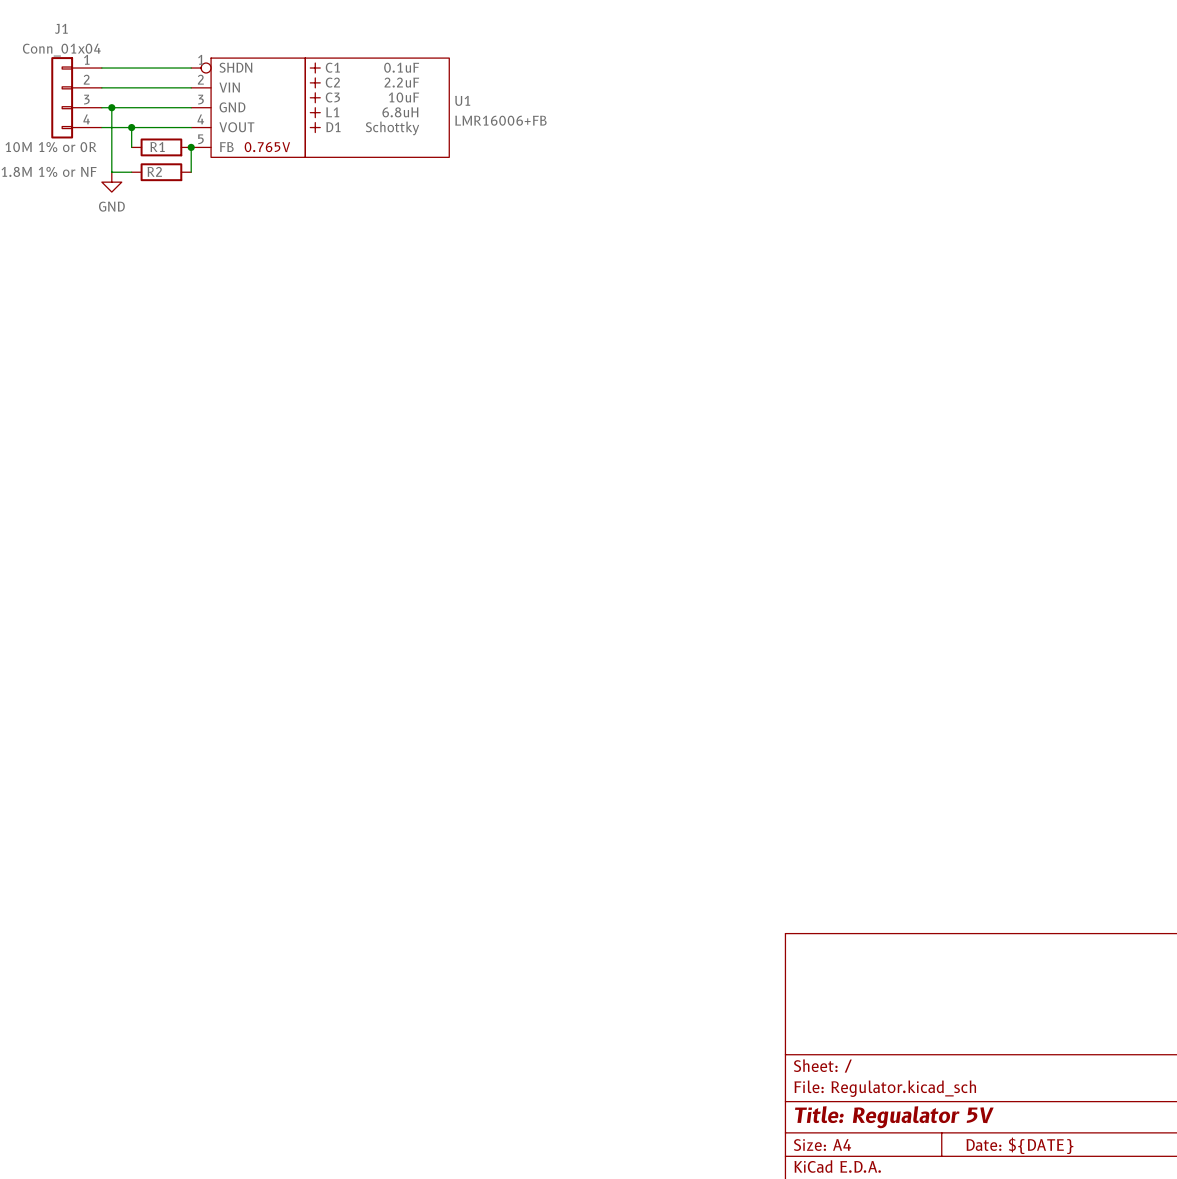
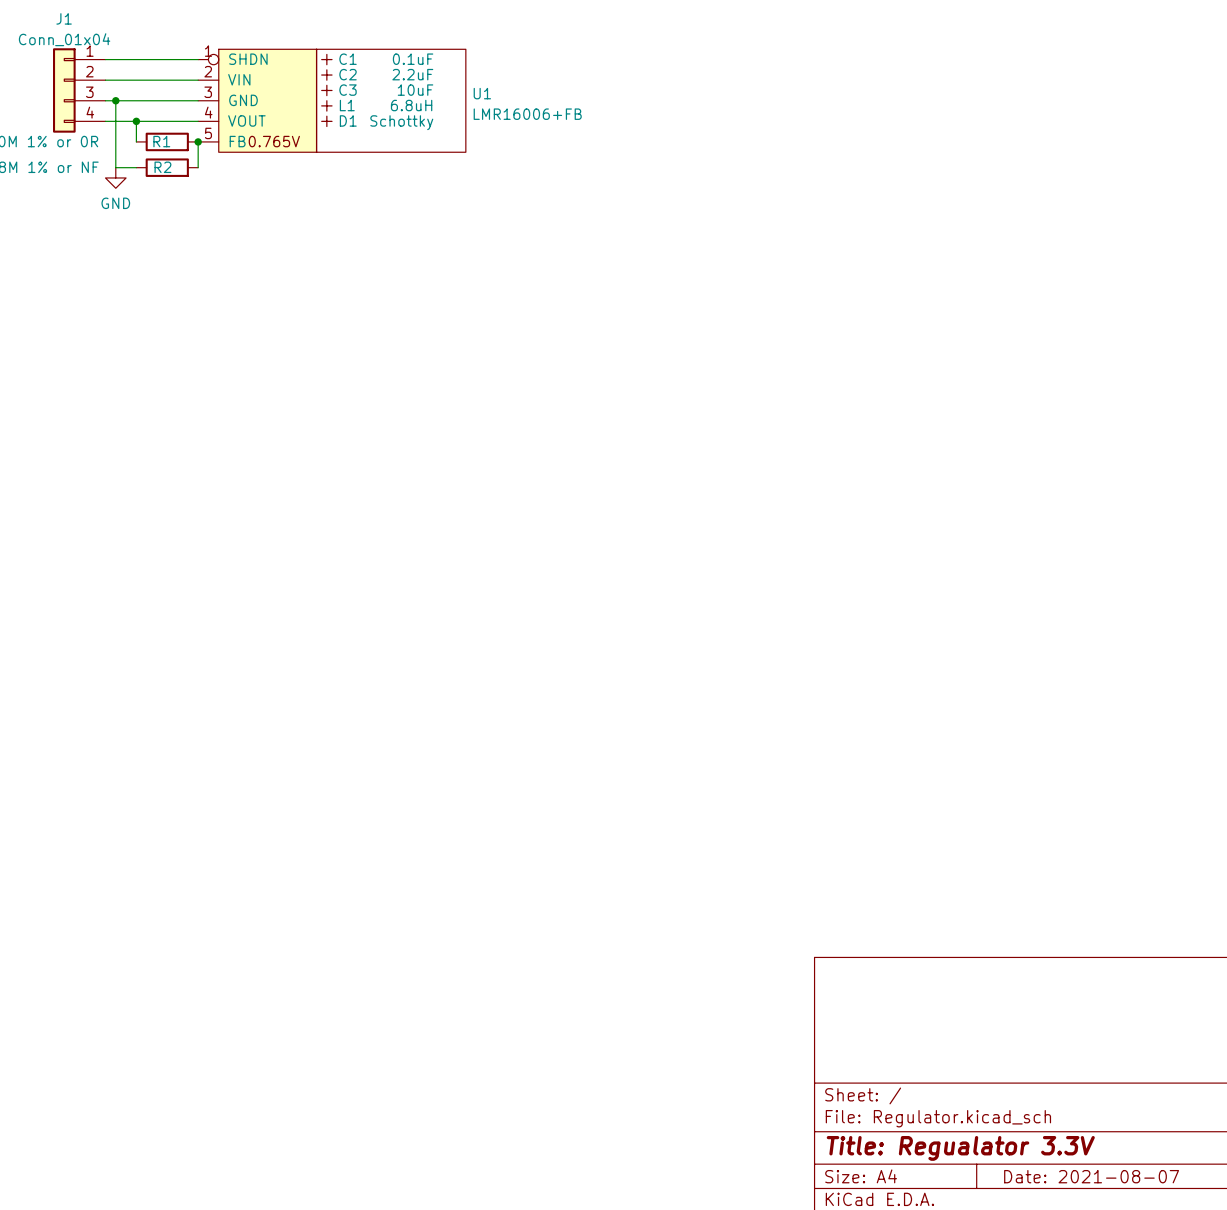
title block: Title: Regualator 5V (894, 1117) -> Title: Regualator 3.3V (960, 1148)
title block: Date: ${DATE} (1019, 1145) -> Date: 2021-08-07 (1091, 1176)

